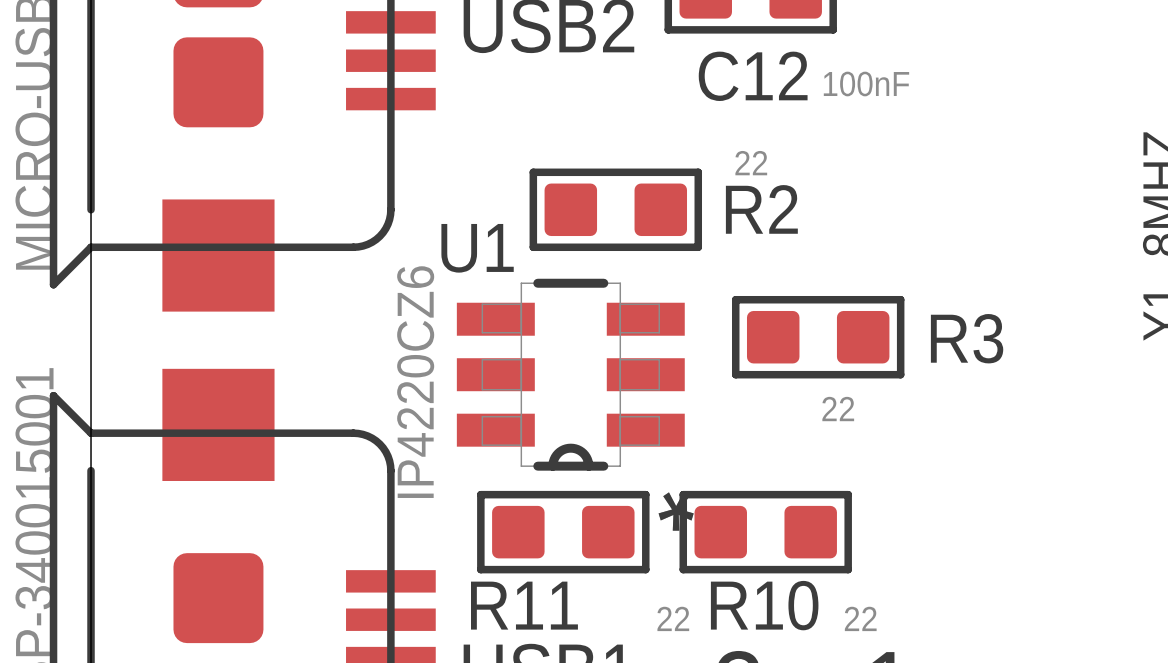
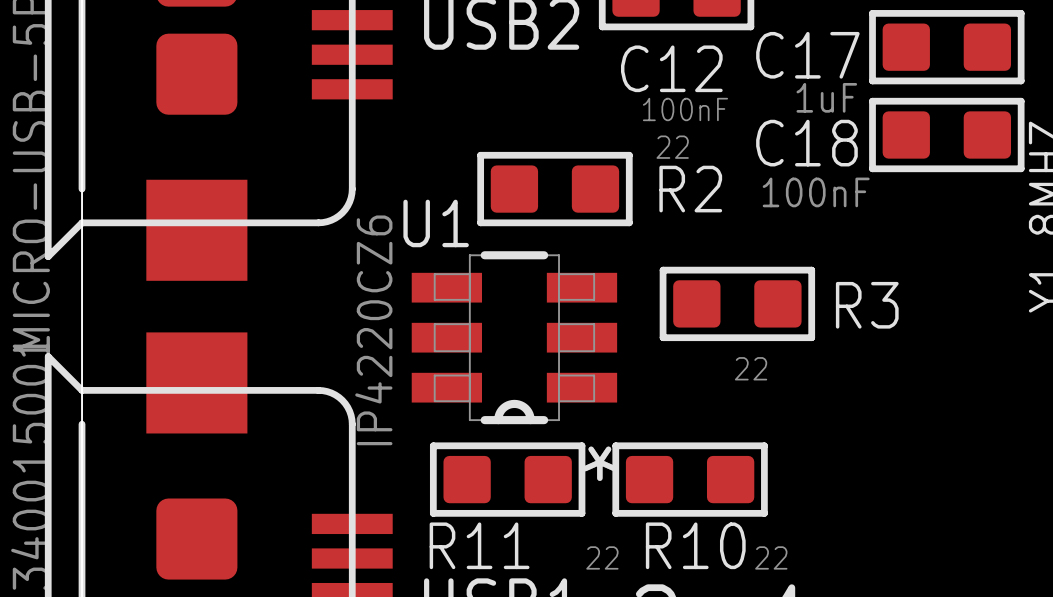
C17: none -> 1uF (946, 47)
C12 value position: 100nF (866, 84) -> 100nF (685, 109)
C18: none -> 100nF (946, 135)

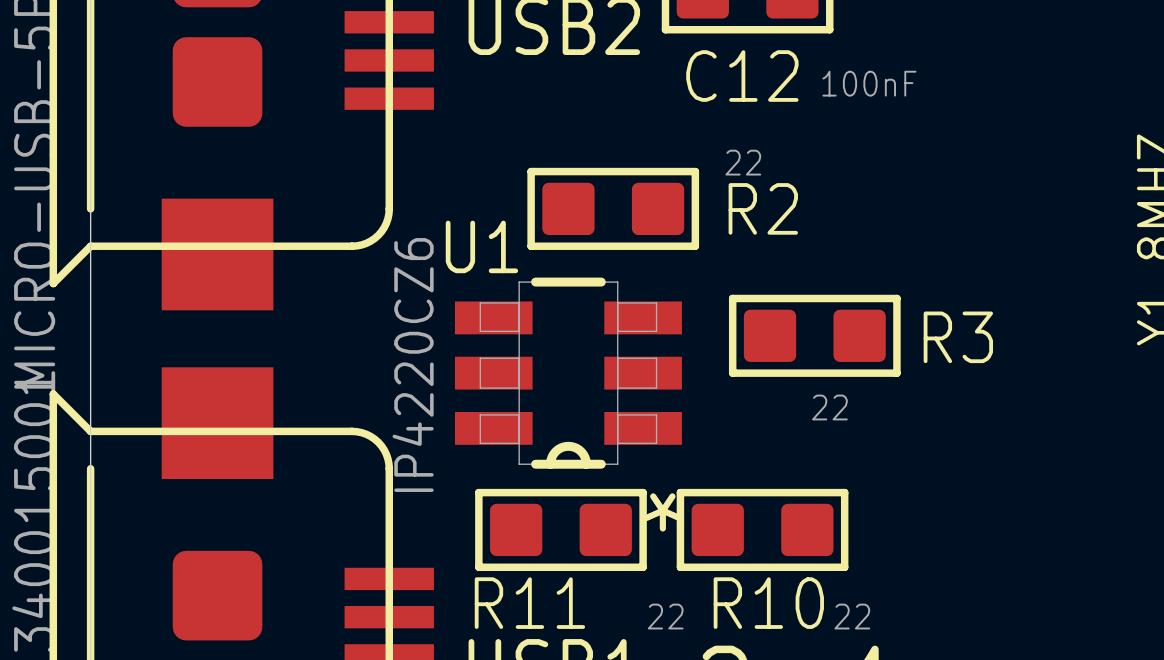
C17: 1uF (946, 47) -> none
C12 value position: 100nF (685, 109) -> 100nF (869, 83)
C18: 100nF (946, 135) -> none

